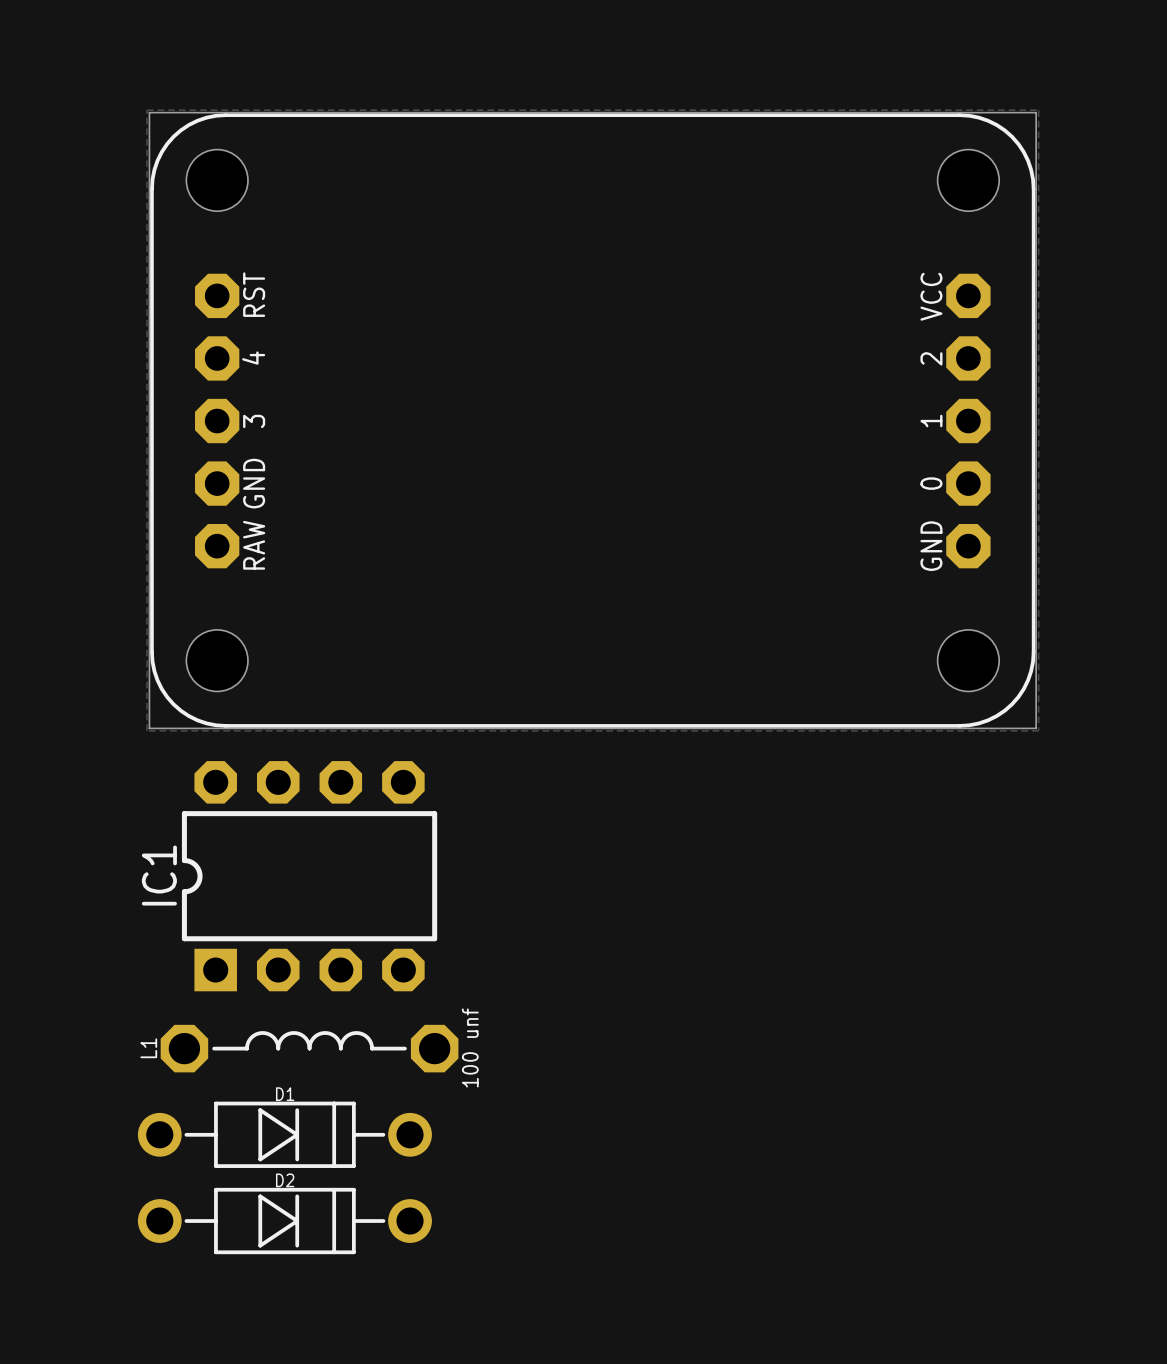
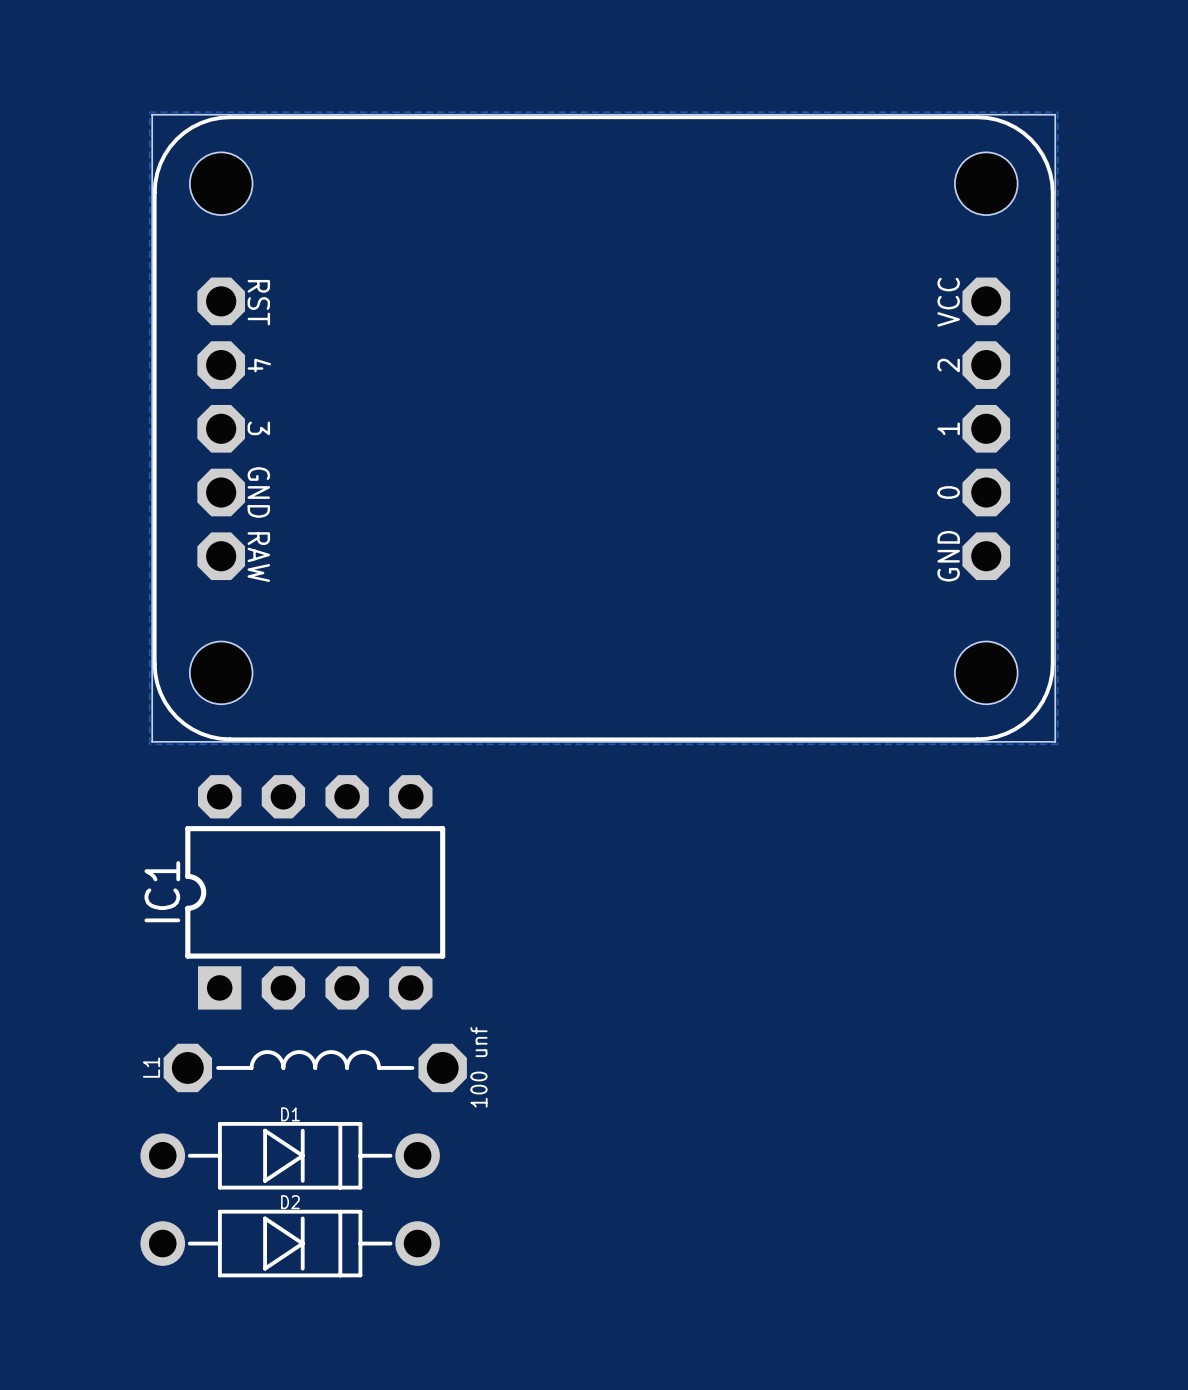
part footprint: [150, 113, 1036, 728] -> [152, 115, 1055, 742]

